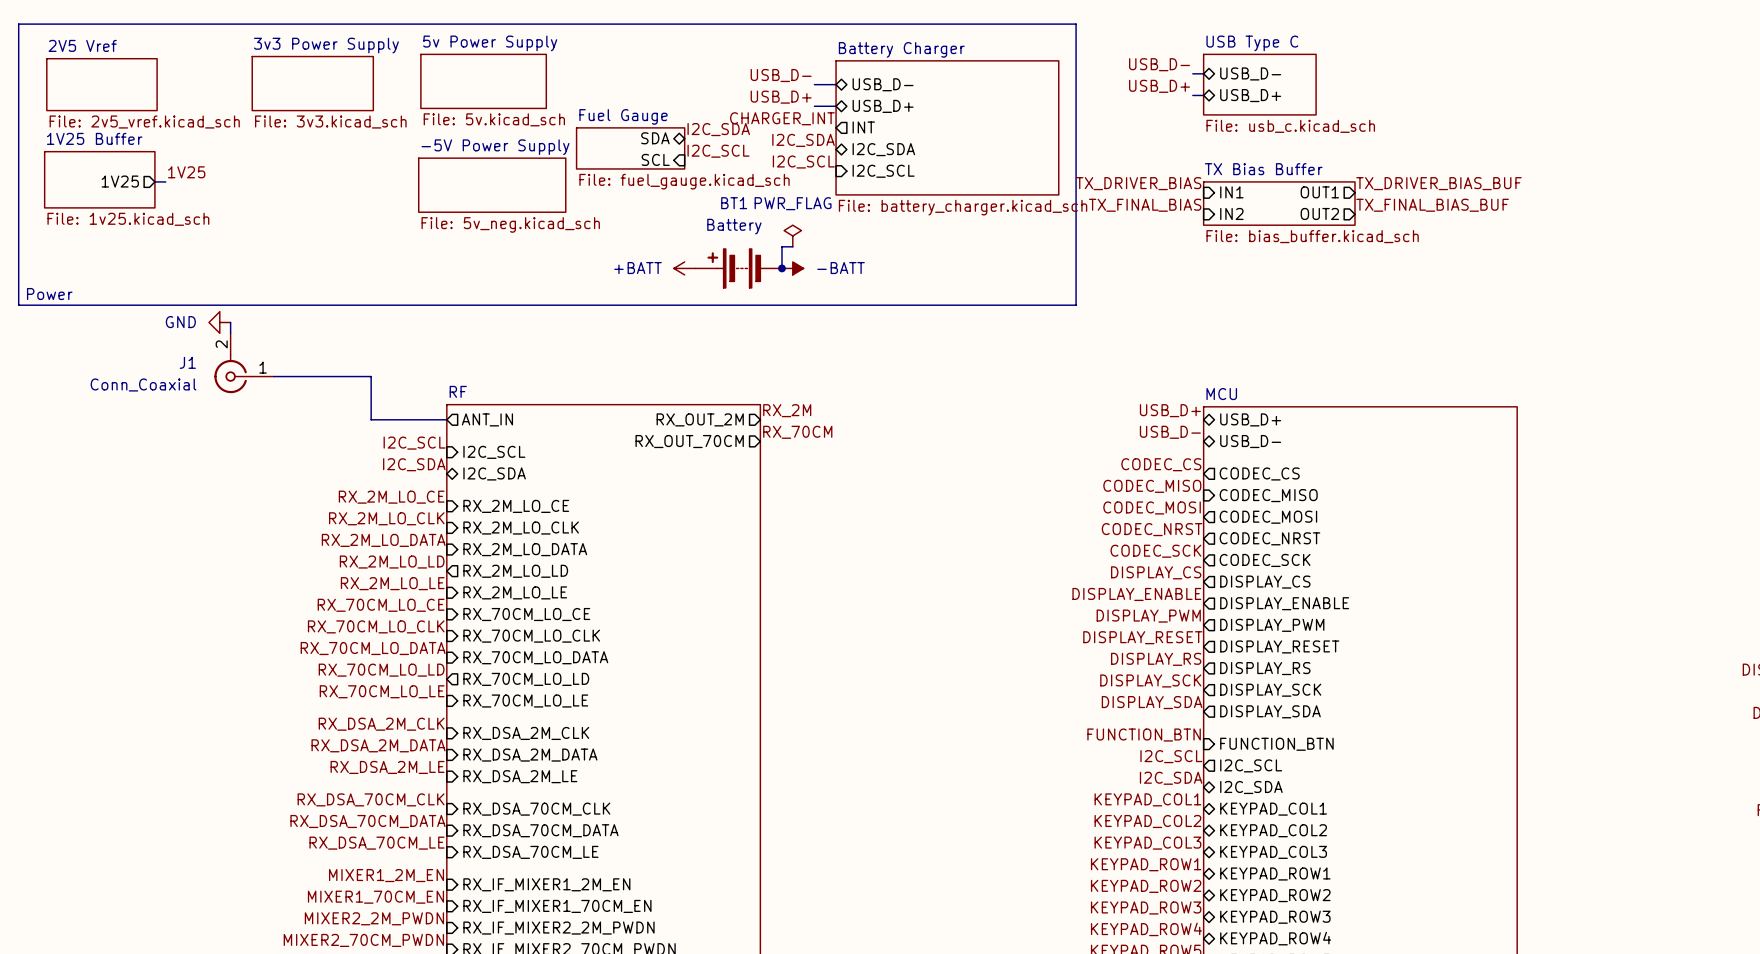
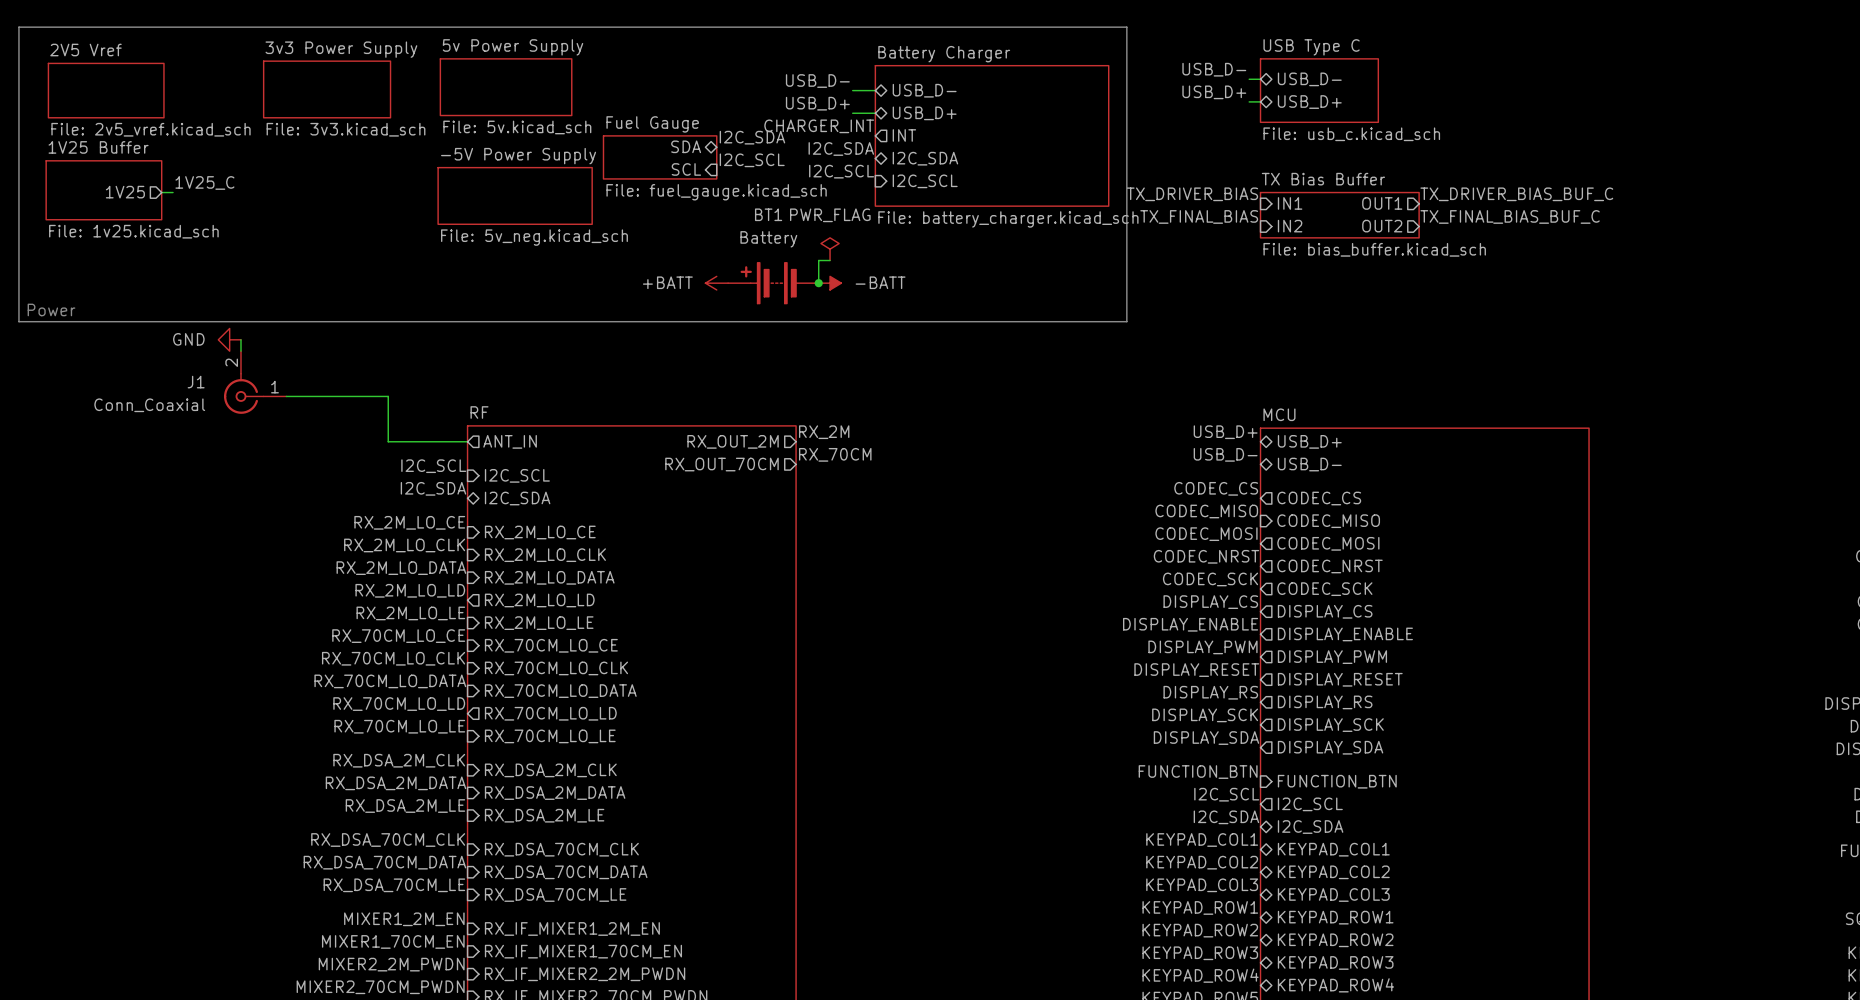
label: 1V25 (186, 172) -> 1V25_C (204, 182)
label: TX_DRIVER_BIAS_BUF (1438, 183) -> TX_DRIVER_BIAS_BUF_C (1516, 194)
label: TX_FINAL_BIAS_BUF (1432, 205) -> TX_FINAL_BIAS_BUF_C (1510, 216)

